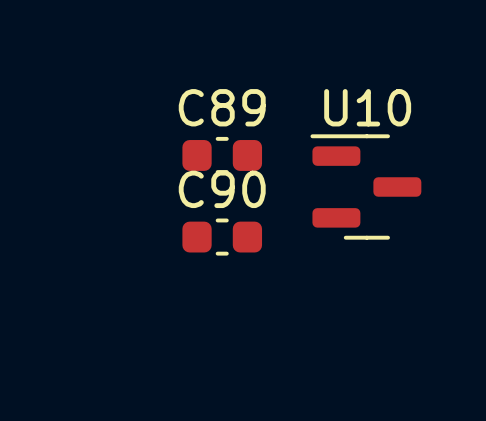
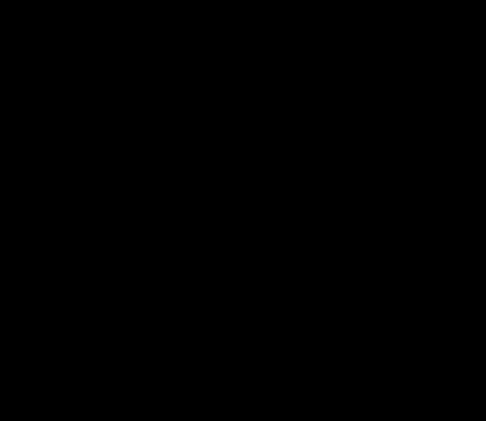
C89: (222, 155) -> none
U10: (365, 186) -> none
C90: (222, 237) -> none

